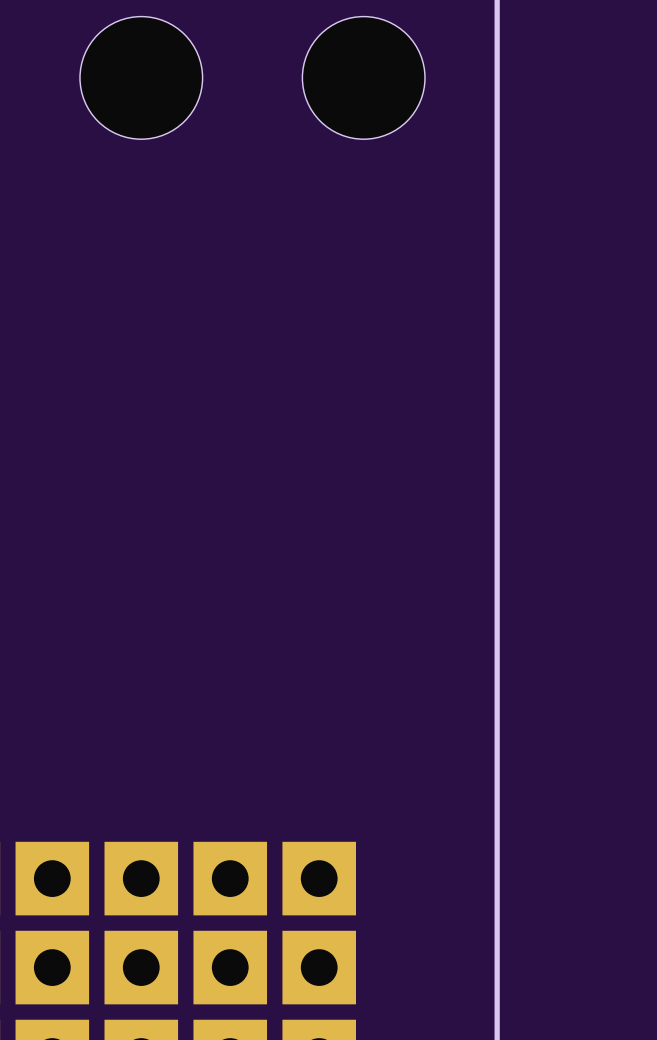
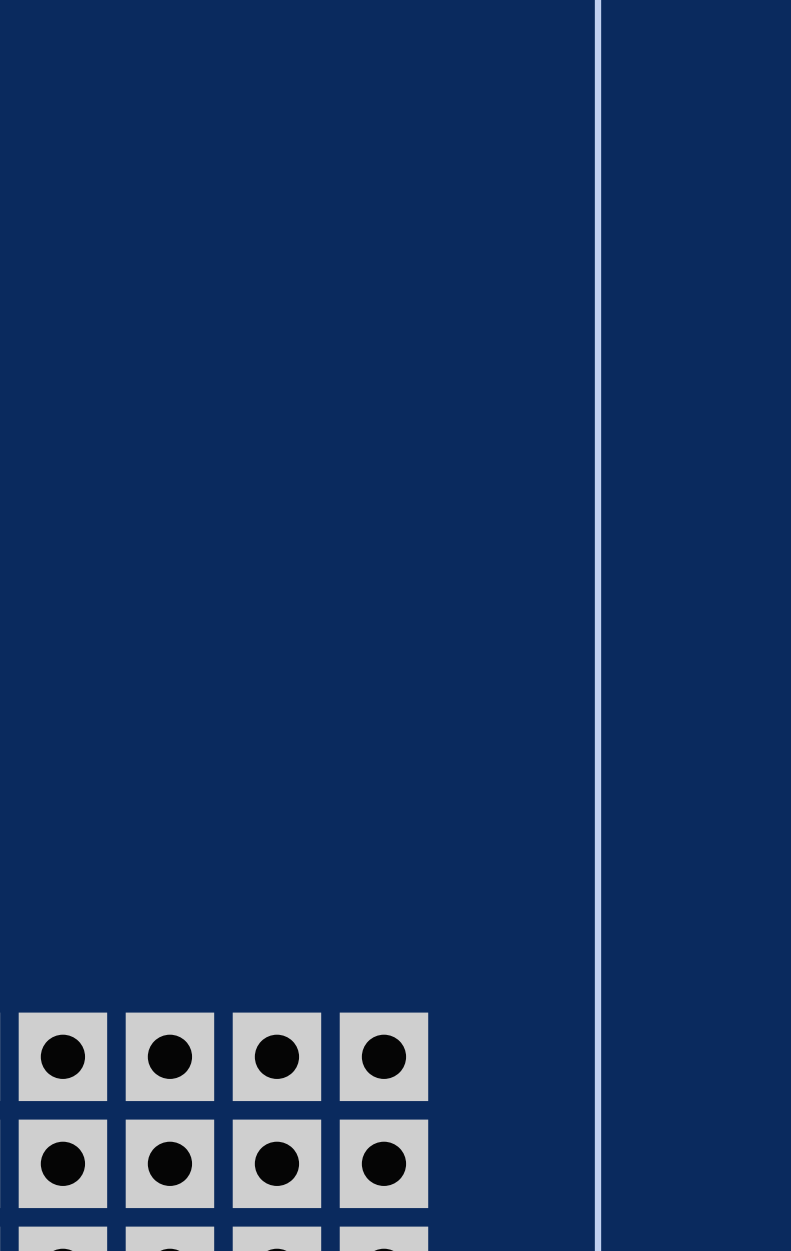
part: (141, 77) -> none
part: (363, 77) -> none

